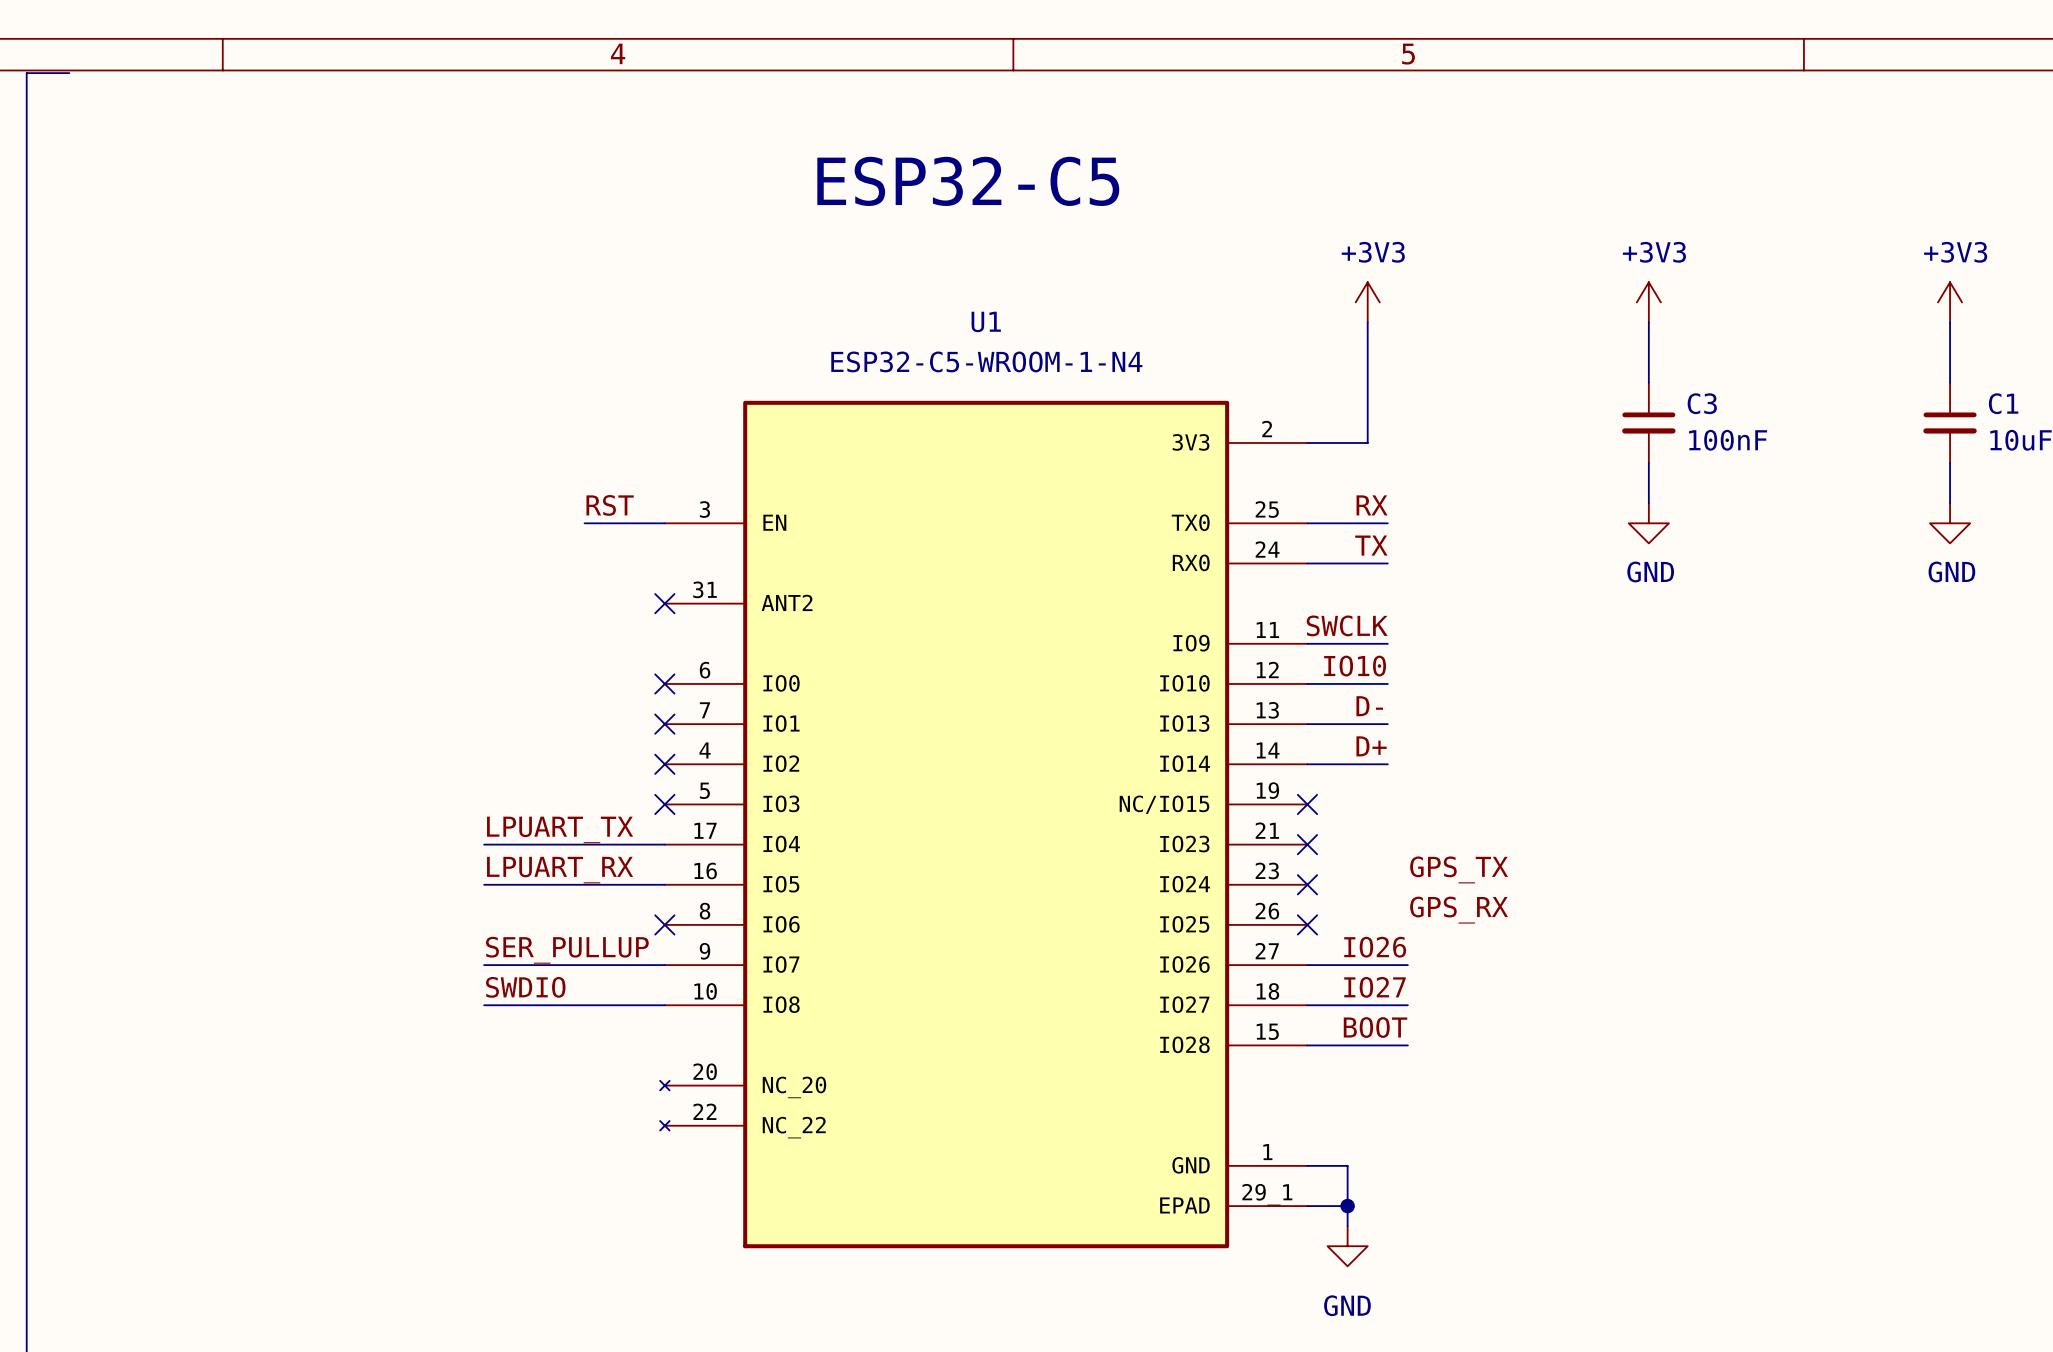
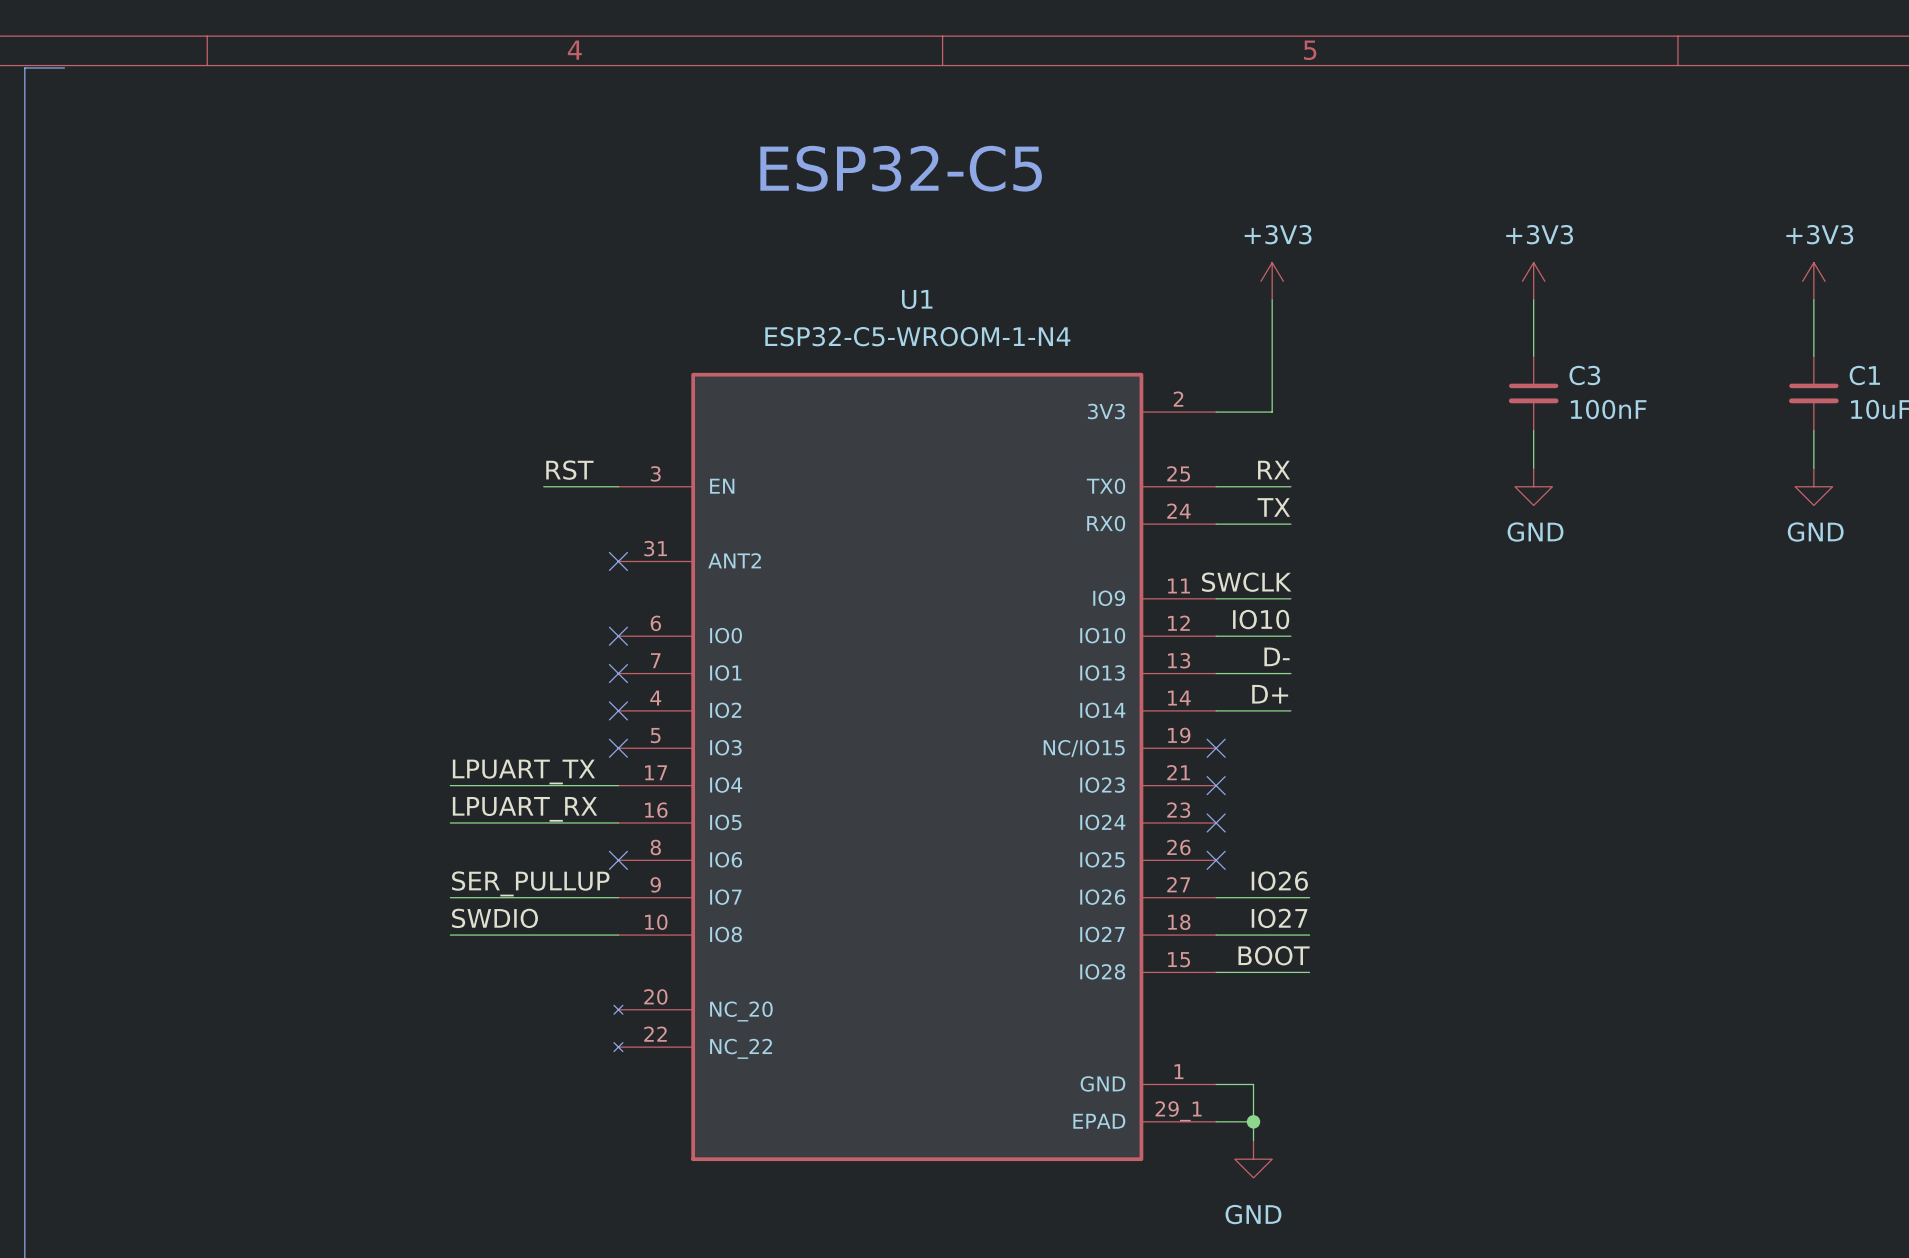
label: GPS_TX (1459, 869) -> none
label: GPS_RX (1459, 910) -> none

